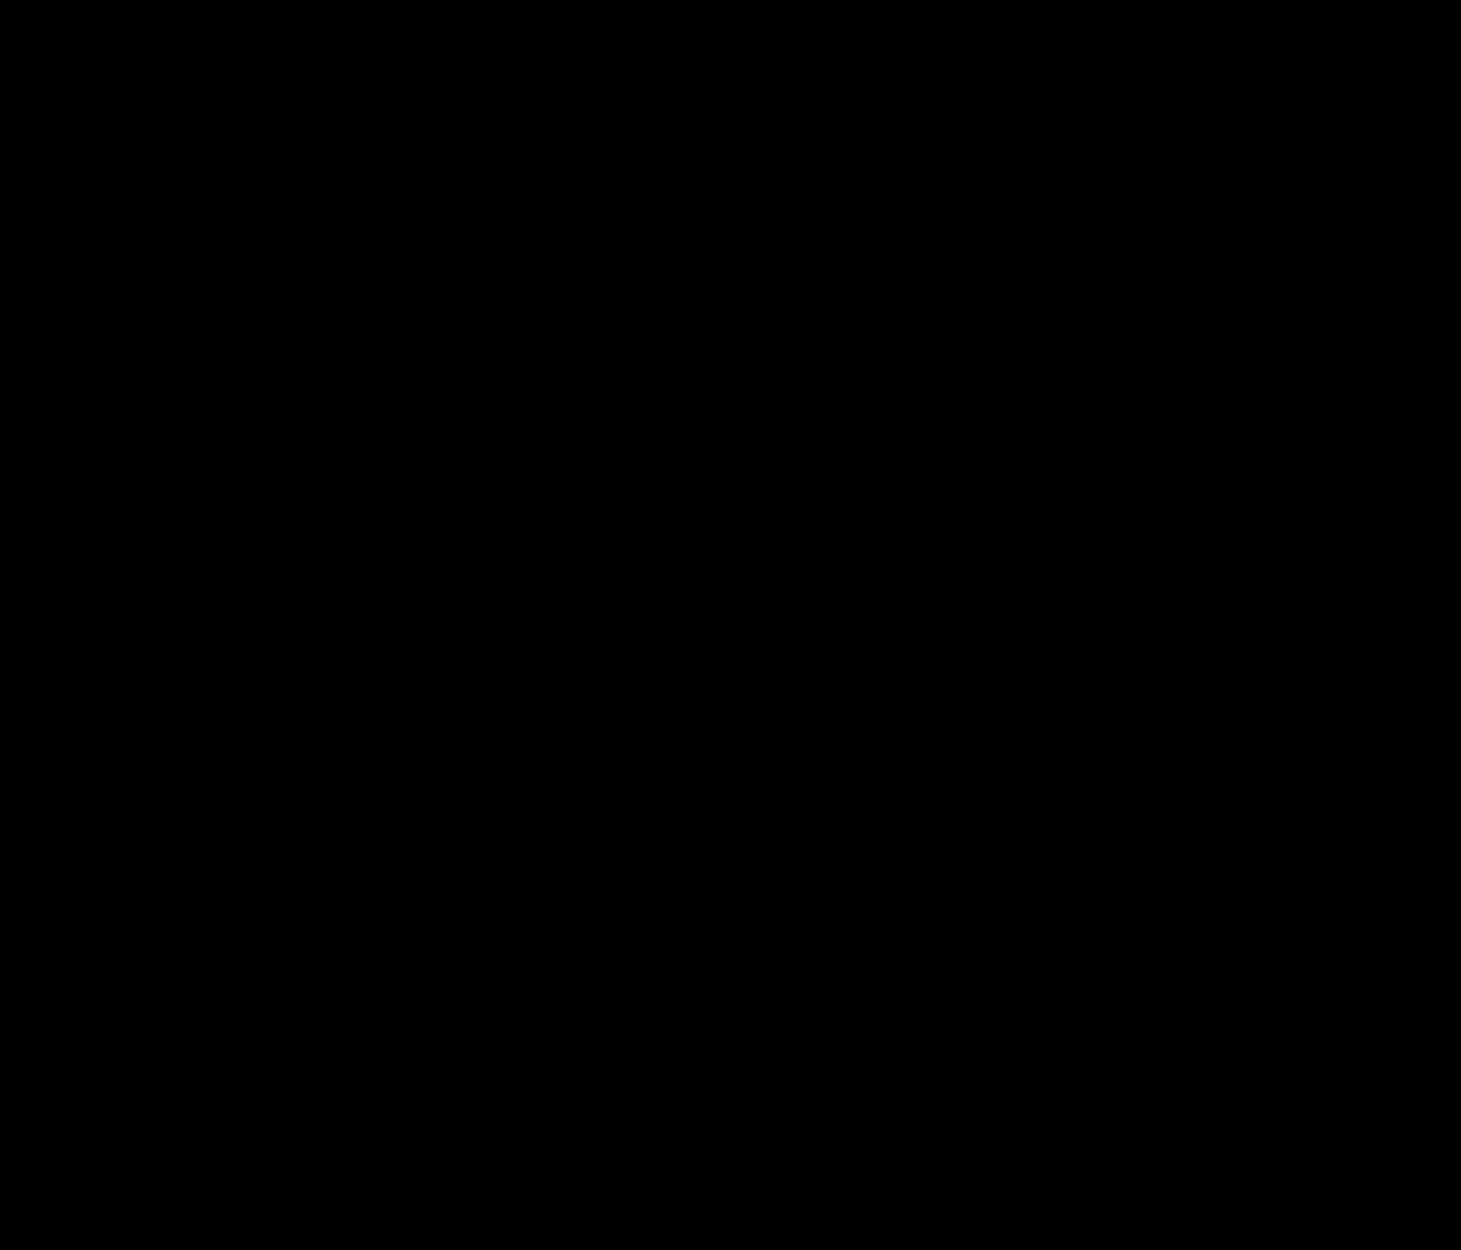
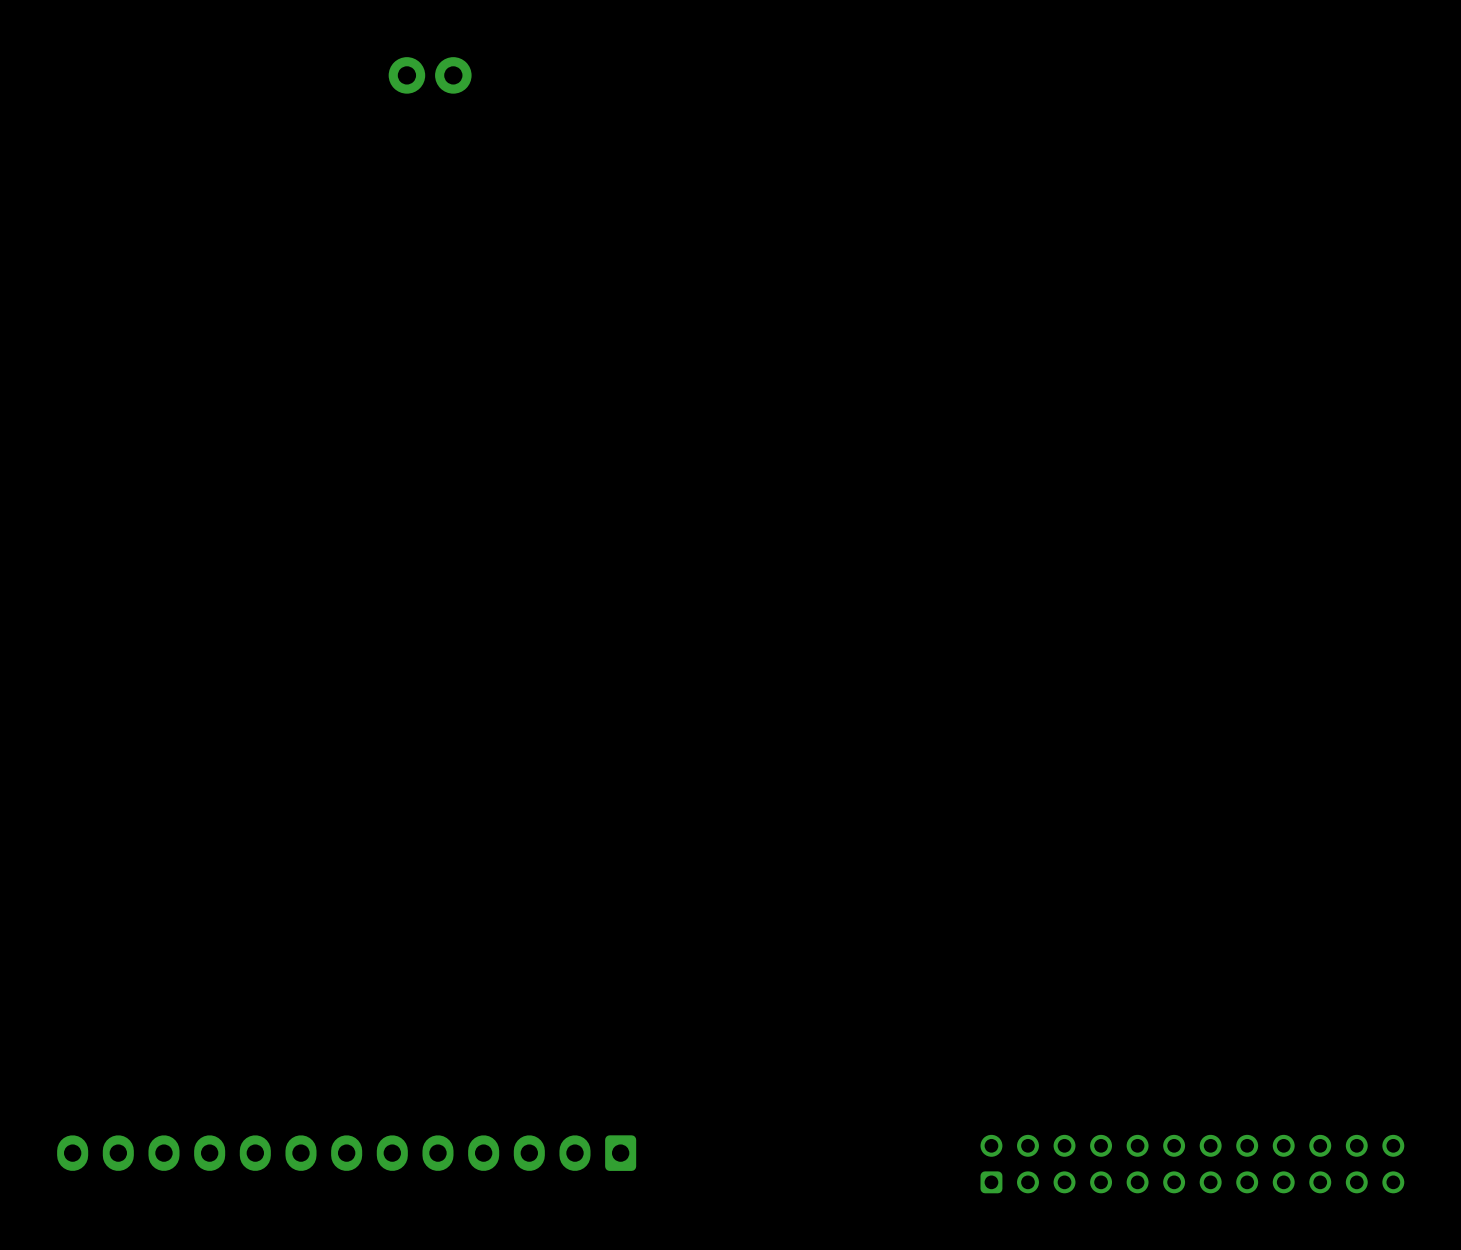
part: none -> (430, 75)
part: none -> (346, 1153)
part: none -> (1192, 1164)

